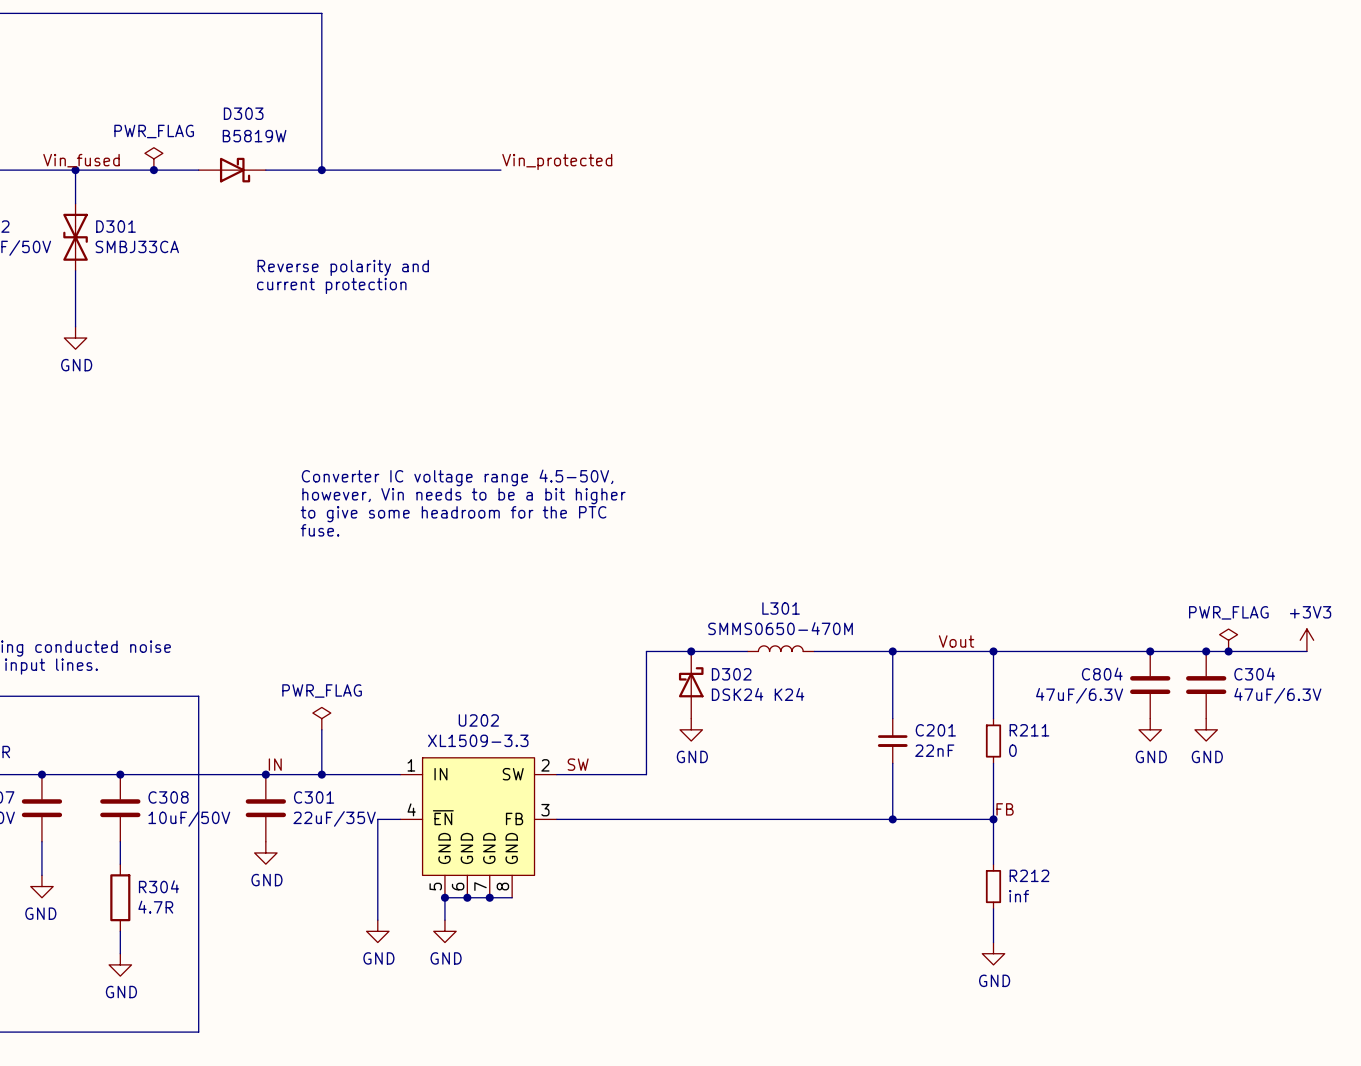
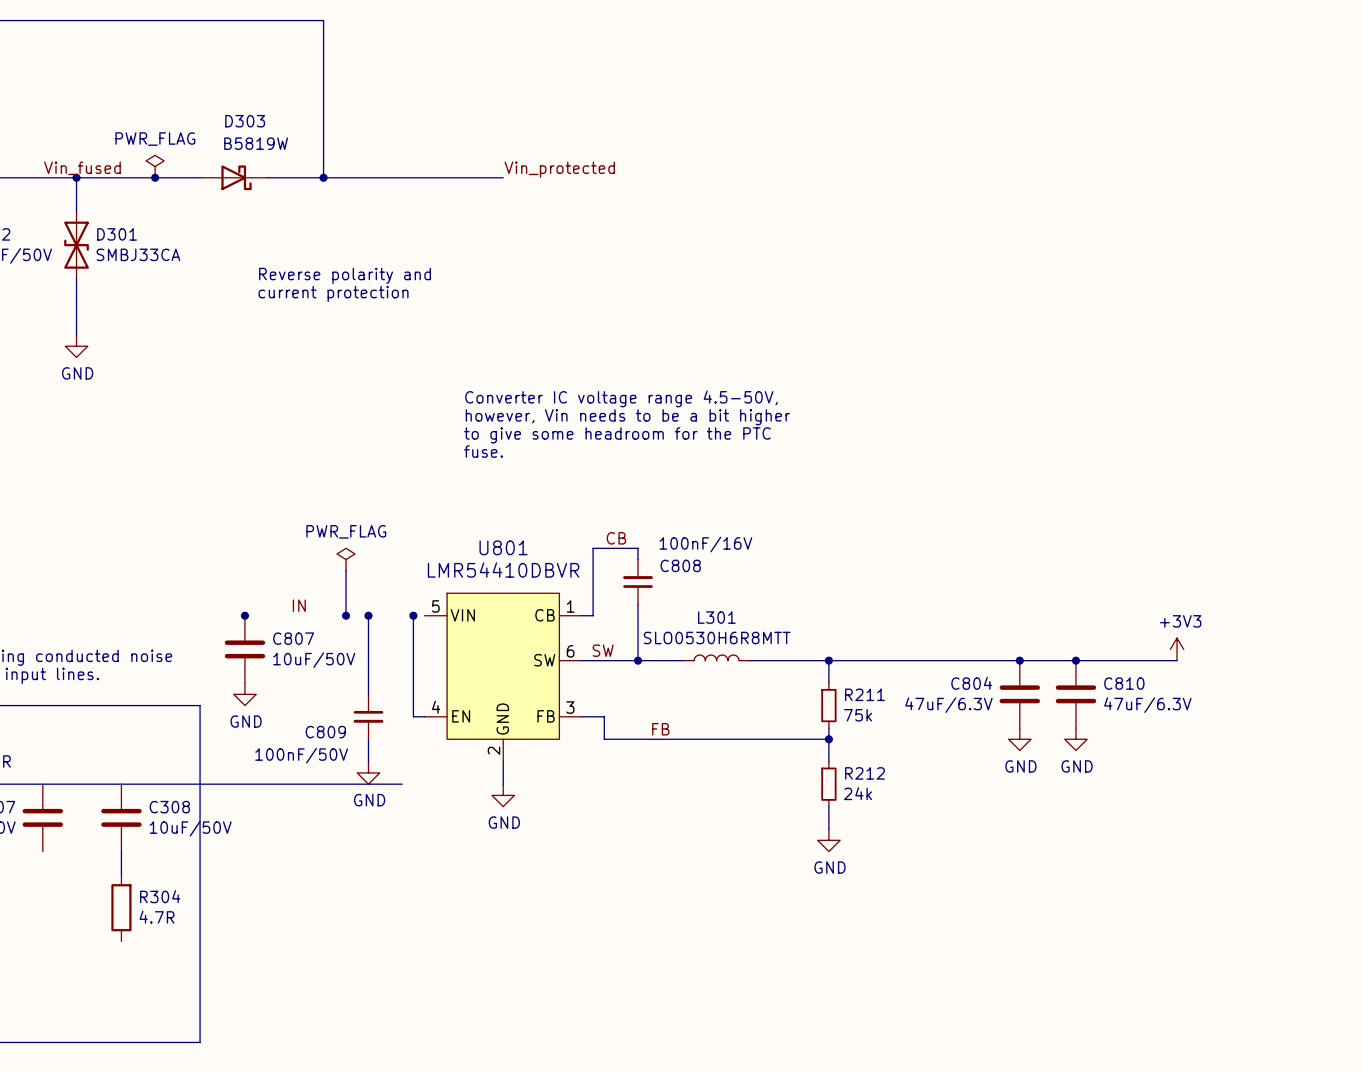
text position: Converter IC voltage range 4.5-50V, (457, 477) -> Converter IC voltage range 4.5-50V, (621, 398)
text position: however, Vin needs to be a bit higher (463, 496) -> however, Vin needs to be a bit higher (627, 417)
text position: to give some headroom for the PTC (453, 514) -> to give some headroom for the PTC (617, 435)
label: none -> CB (616, 538)
text position: fuse. (320, 530) -> fuse. (483, 451)
wire: none -> (637, 559) (637, 548) (593, 548) (593, 615) (581, 615)
C808: none -> 100nF/16V (637, 582)
wire: none -> (637, 604) (637, 660)
junction: none -> (244, 615)
junction: none -> (346, 615)
wire: none -> (368, 615) (368, 694)
junction: none -> (368, 615)
wire: none -> (413, 615) (413, 716) (424, 716)
junction: none -> (413, 615)
L301 value: SMMS0650-470M (780, 628) -> SLO0530H6R8MTT (717, 638)
C807: none -> 10uF/50V (244, 649)
power symbol: PWR_FLAG (1228, 640) -> none
power symbol position: +3V3 (1306, 640) -> +3V3 (1177, 649)
label: Vout (956, 641) -> none
L301 position: (780, 648) -> (716, 657)
junction: none -> (637, 660)
wire: (646, 651) (646, 774) (556, 774) -> (649, 660) (581, 660)
wire: (680, 651) (747, 651) -> (817, 660) (750, 660)
junction: (691, 651) -> none
wire: none -> (828, 660) (828, 683)
junction: none -> (828, 660)
wire: (892, 651) (892, 718) -> none
junction: (892, 651) -> none
wire: (993, 651) (993, 718) -> none
junction position: (993, 651) -> (1019, 660)
junction: none -> (1075, 660)
junction: (1150, 651) -> none
wire: (1172, 651) (1306, 651) -> none
junction: (1206, 651) -> none
junction: (1228, 651) -> none
U801: none -> LMR54410DBVR (503, 677)
power symbol: none -> GND (244, 694)
D302: DSK24 K24 (691, 685) -> none
C810: none -> 47uF/6.3V (1075, 694)
C804 position: (1150, 685) -> (1019, 694)
C304: 47uF/6.3V (1206, 685) -> none
C809: none -> 100nF/50V (368, 716)
wire: none -> (581, 716) (604, 716) (604, 739) (828, 739)
power symbol position: PWR_FLAG (321, 718) -> PWR_FLAG (346, 559)
wire: none -> (828, 728) (828, 761)
label: none -> FB (660, 729)
wire: (321, 729) (321, 774) -> (346, 570) (346, 615)
wire: none -> (368, 739) (368, 761)
power symbol: GND (691, 729) -> none
junction: none -> (828, 739)
power symbol: none -> GND (1019, 739)
power symbol: none -> GND (1075, 739)
power symbol: GND (1150, 729) -> none
power symbol: GND (1206, 729) -> none
C201: 22nF (892, 741) -> none
R211 position: (993, 741) -> (828, 705)
R211 value: 0 (1012, 750) -> 75k (858, 715)
power symbol: none -> GND (368, 772)
wire: (892, 763) (892, 819) -> none
wire: (993, 763) (993, 864) -> none
label position: IN (275, 764) -> IN (299, 605)
label position: SW (578, 764) -> SW (603, 650)
junction: (41, 774) -> none
junction: (120, 774) -> none
junction: (265, 774) -> none
junction: (321, 774) -> none
power symbol: none -> GND (503, 795)
wire: none -> (828, 806) (828, 829)
C301: 22uF/35V (265, 808) -> none
label: FB (1005, 809) -> none
wire: (400, 819) (377, 819) (377, 920) -> none
wire: (556, 819) (993, 819) -> none
junction: (892, 819) -> none
junction: (993, 819) -> none
U202: XL1509-3.3 (478, 827) -> none
power symbol: none -> GND (828, 840)
wire: (41, 841) (41, 875) -> none
power symbol: GND (265, 852) -> none
power symbol: GND (41, 886) -> none
R212 position: (993, 886) -> (828, 784)
R212 value: inf (1019, 896) -> 24k (858, 793)
junction: (444, 897) -> none
junction: (467, 897) -> none
junction: (489, 897) -> none
wire: (512, 897) (444, 897) (444, 920) -> none
wire: (993, 908) (993, 942) -> none
wire: (120, 931) (120, 953) -> none
power symbol: GND (377, 931) -> none
power symbol: GND (444, 931) -> none
power symbol: GND (993, 953) -> none
power symbol: GND (120, 964) -> none

